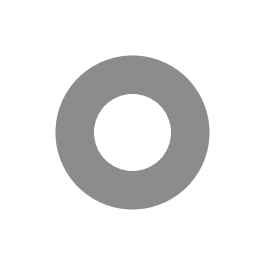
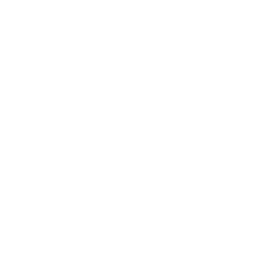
part: (132, 132) -> none

